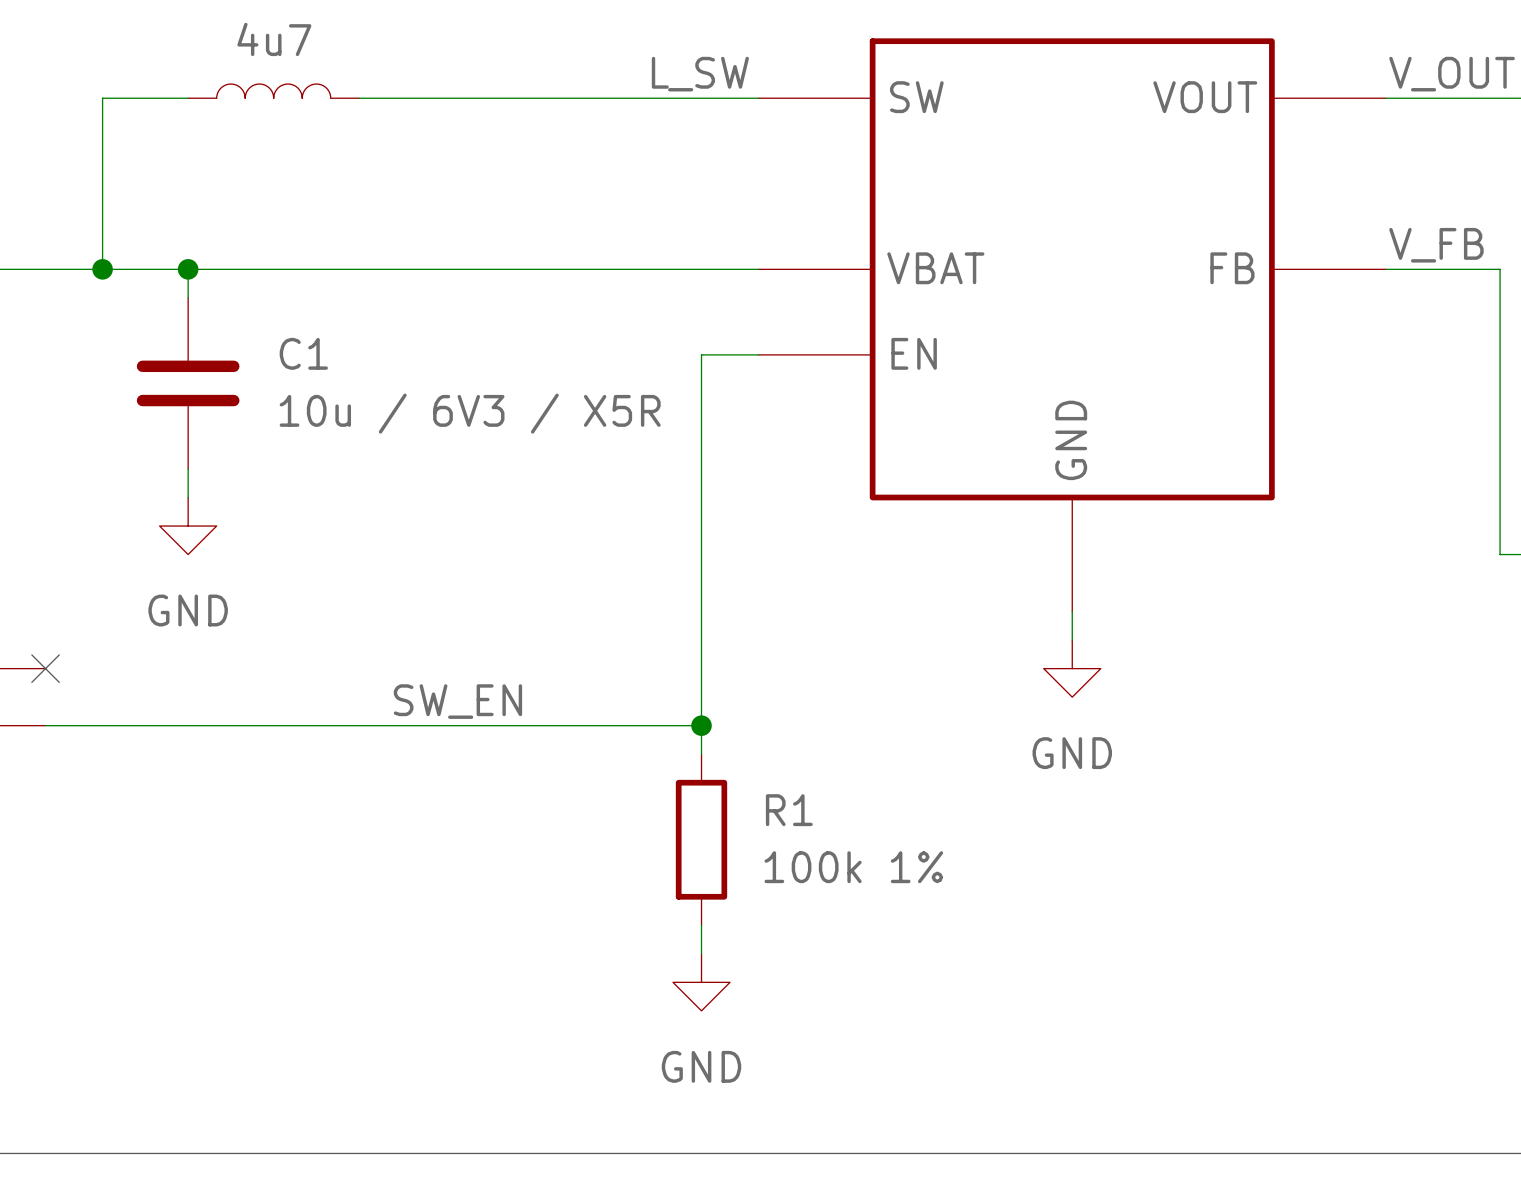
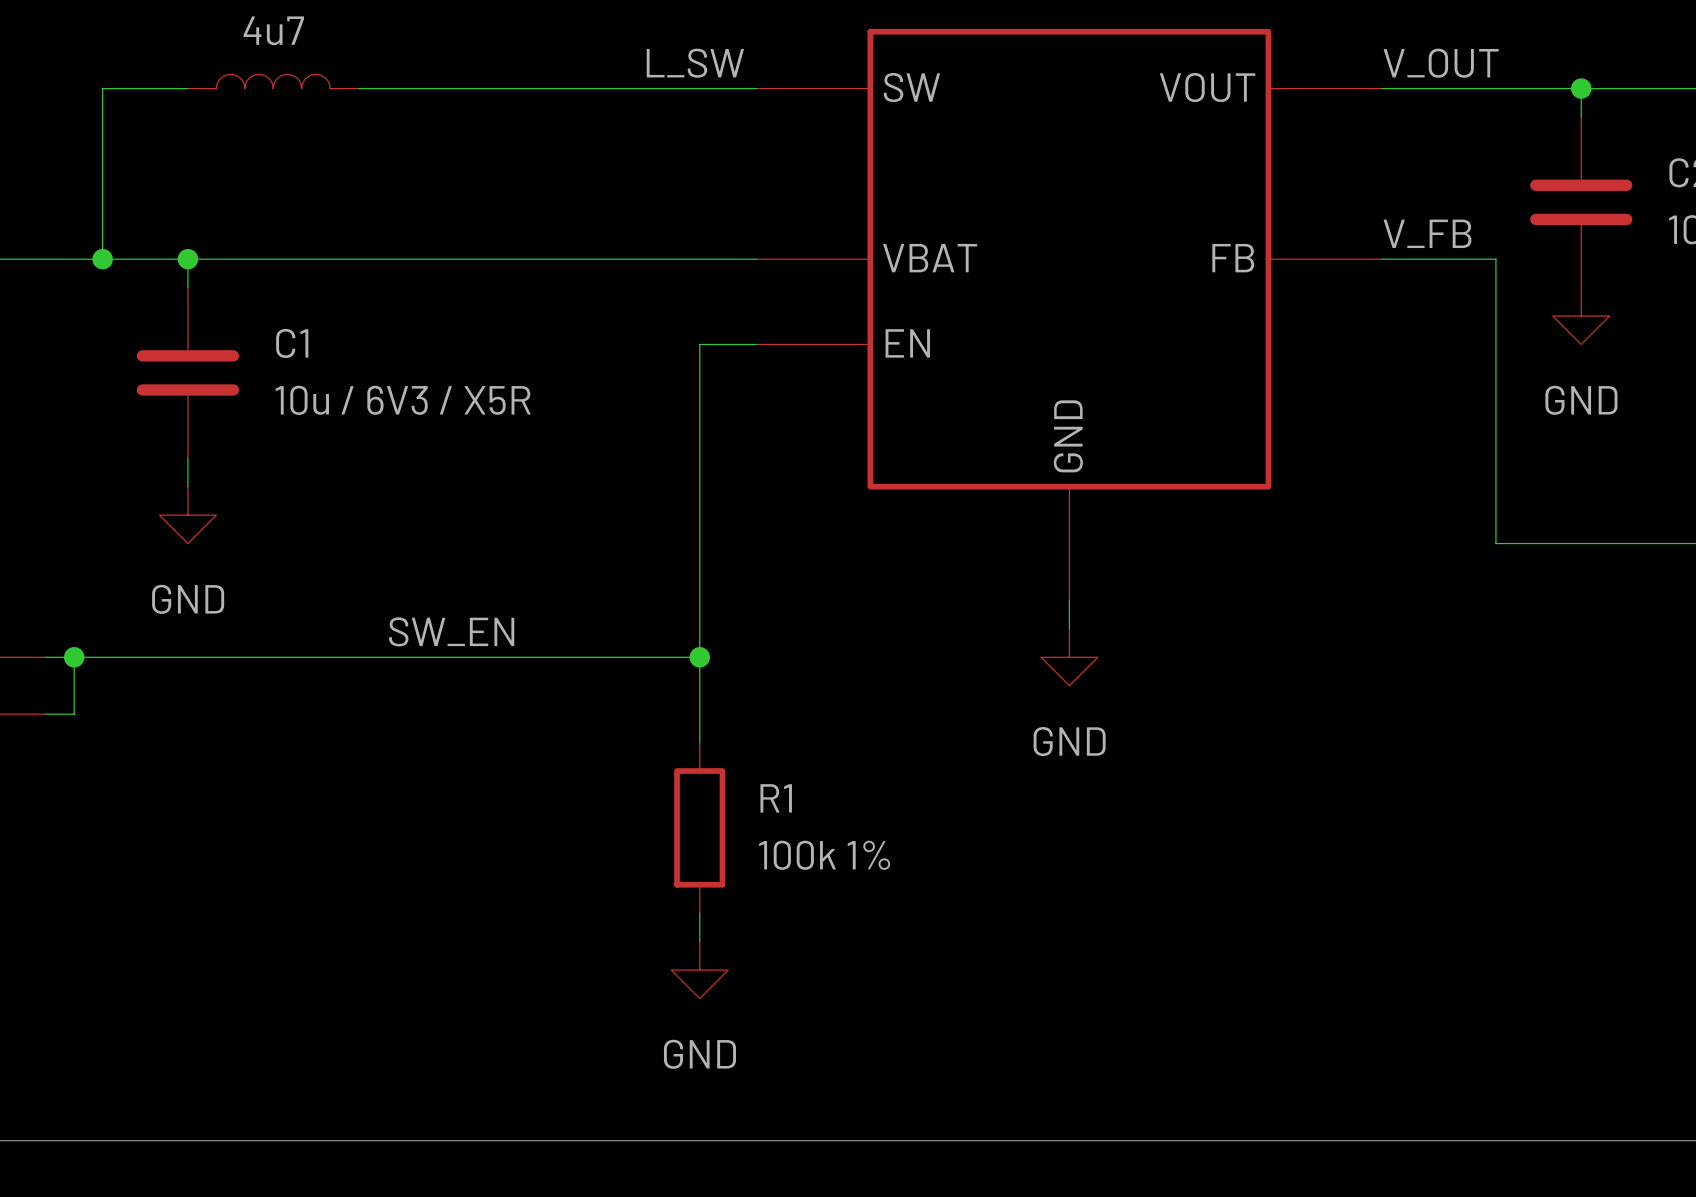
wire: none -> (45, 657) (699, 657)
no-connect mark: (45, 668) -> none
junction: none -> (74, 657)
label position: SW_EN (457, 701) -> SW_EN (451, 631)
wire: (74, 725) (701, 725) -> (74, 714) (74, 657)
junction position: (701, 725) -> (699, 657)

